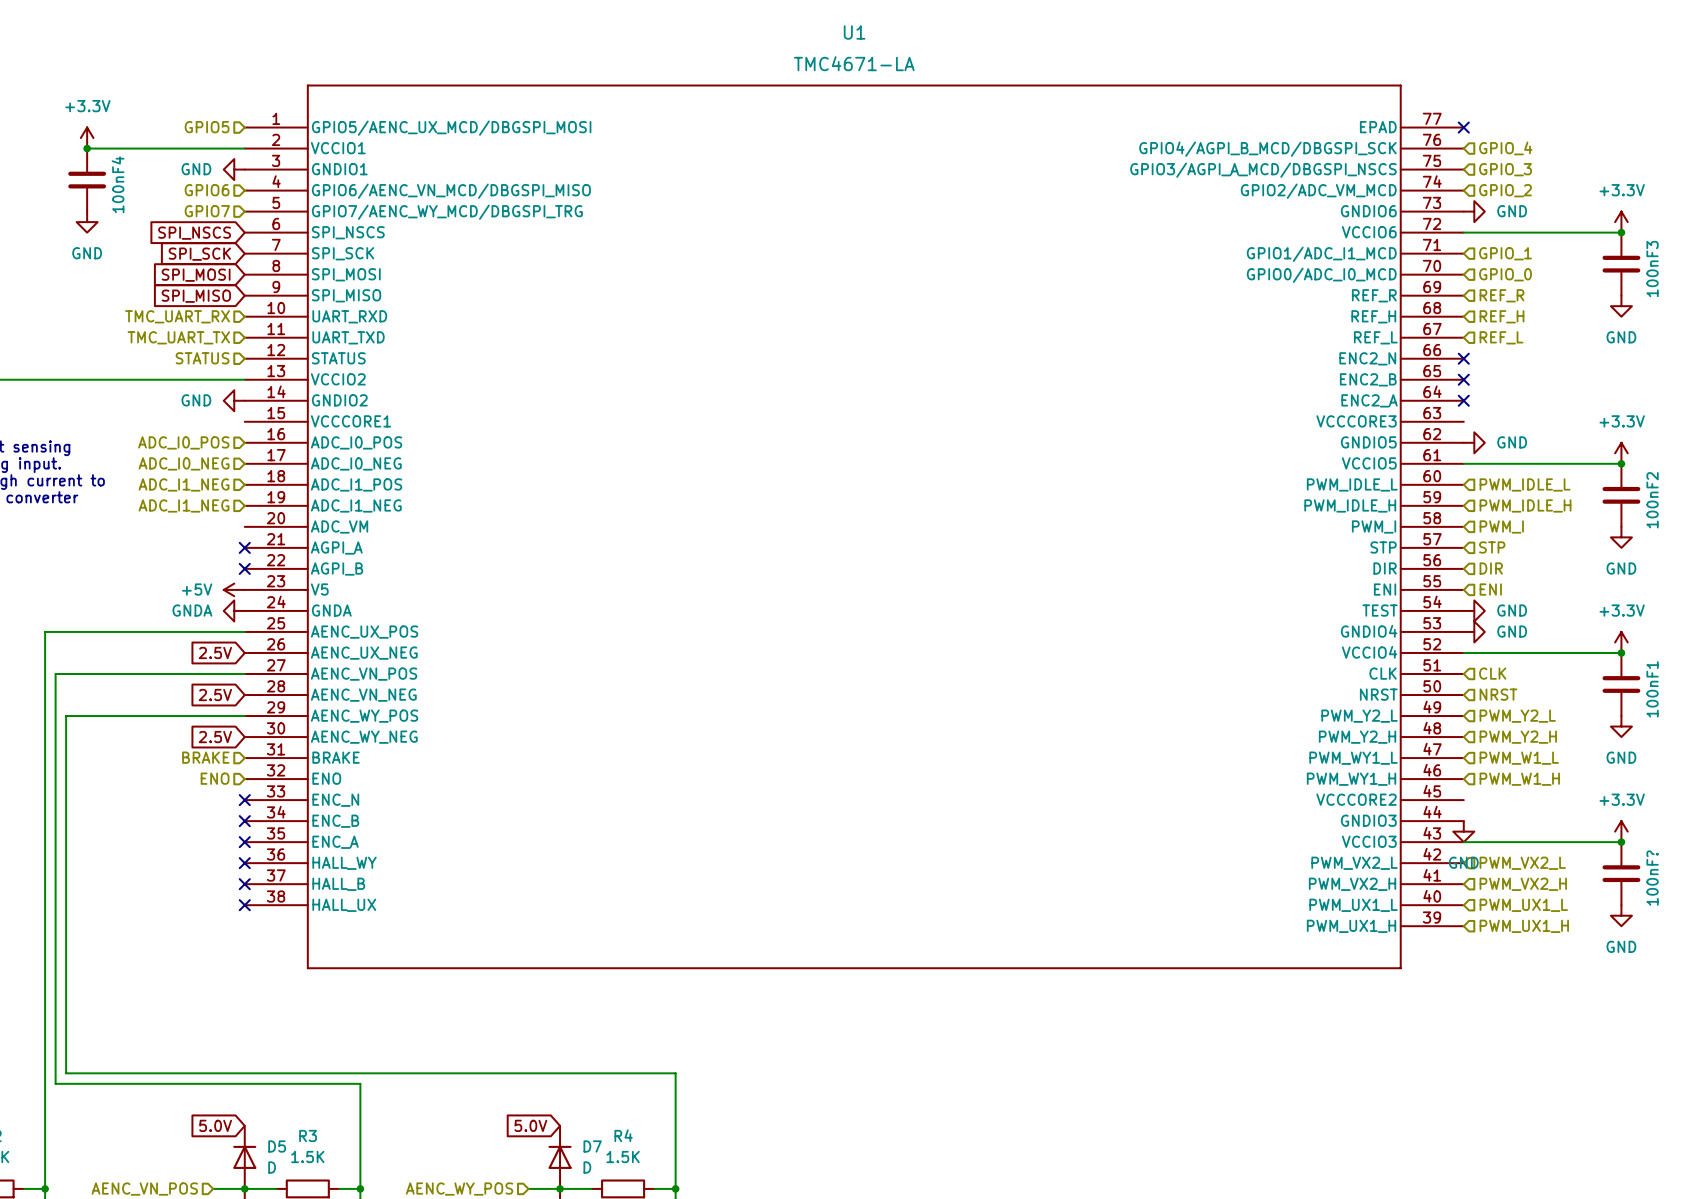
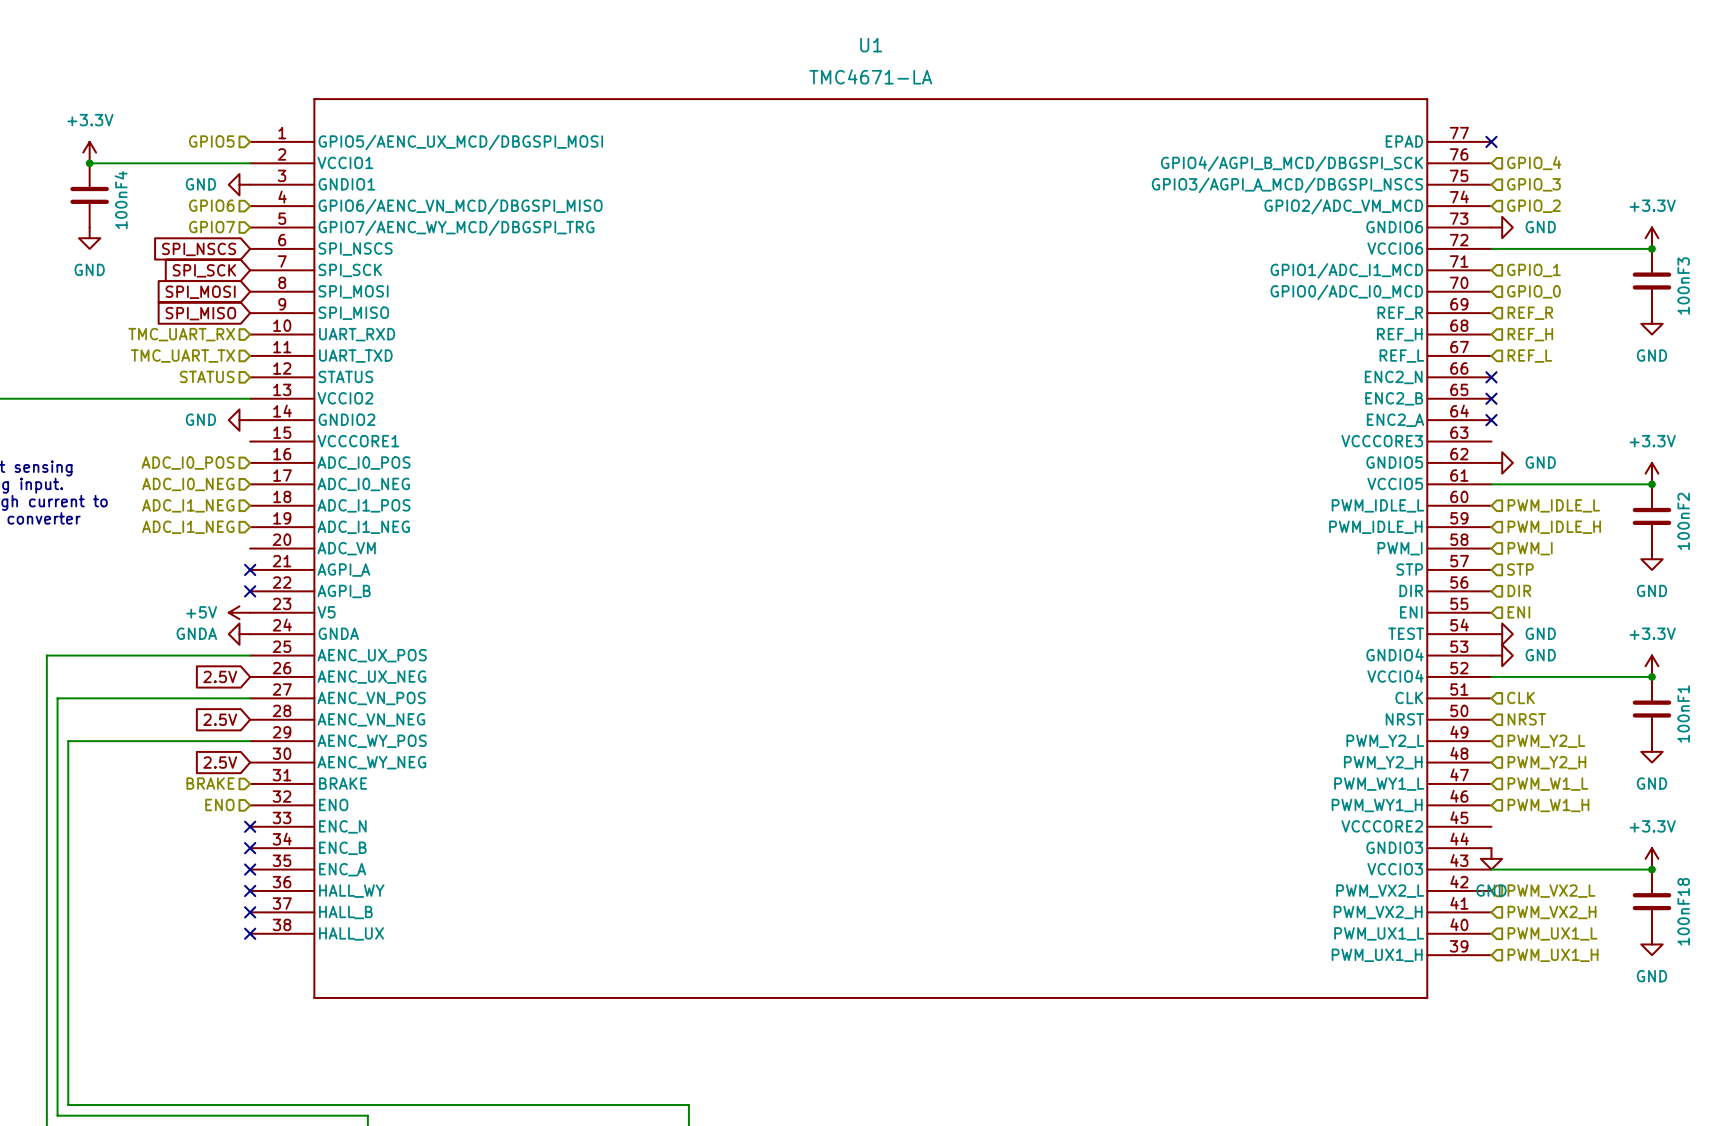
100nF? name: 100nF? (1652, 878) -> 100nF18 (1683, 911)

